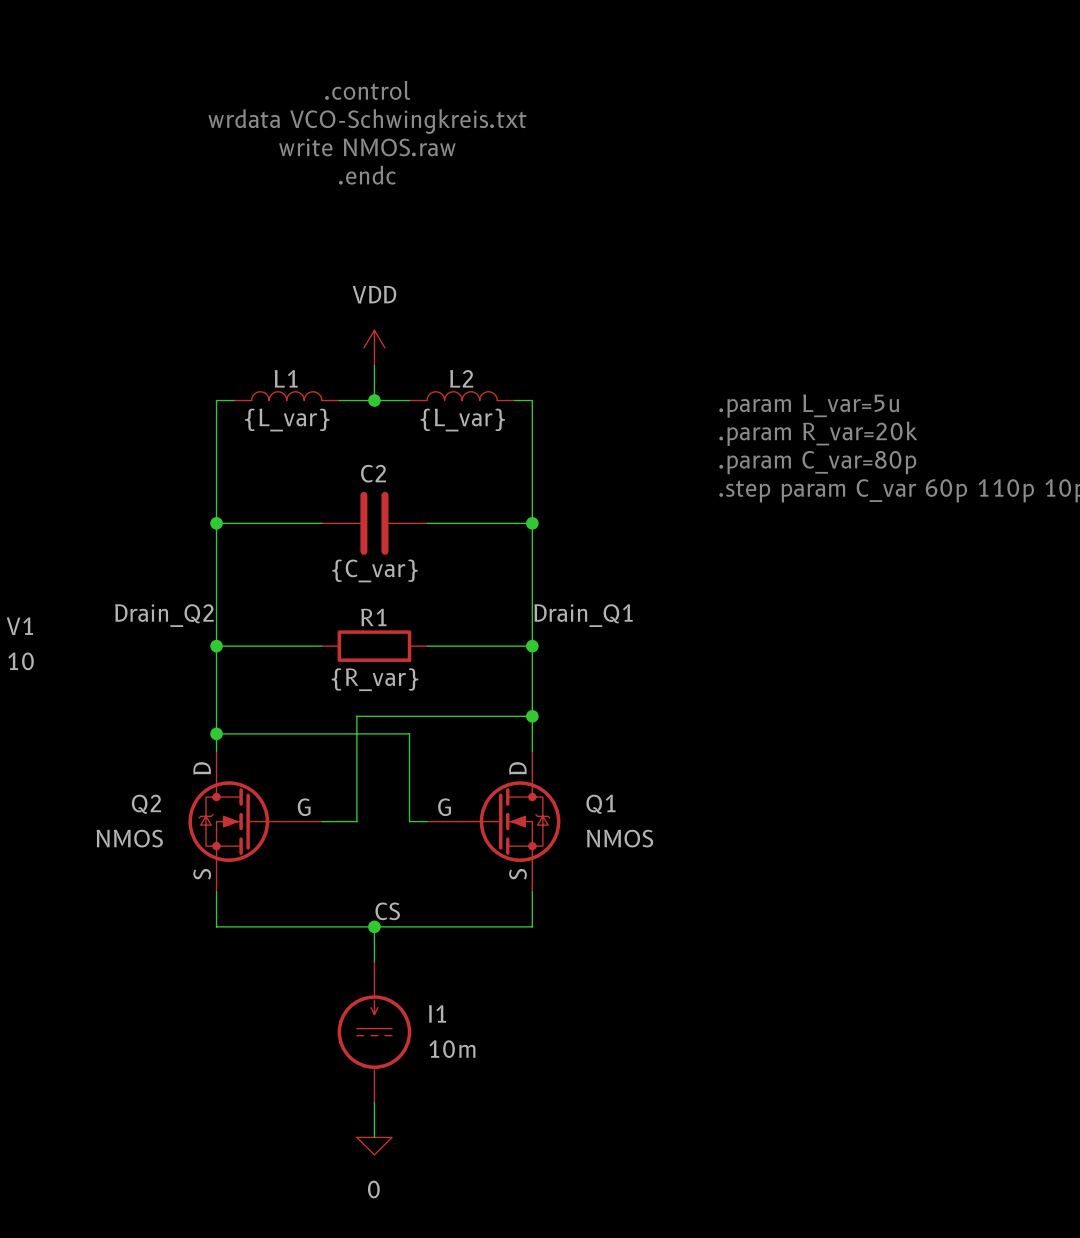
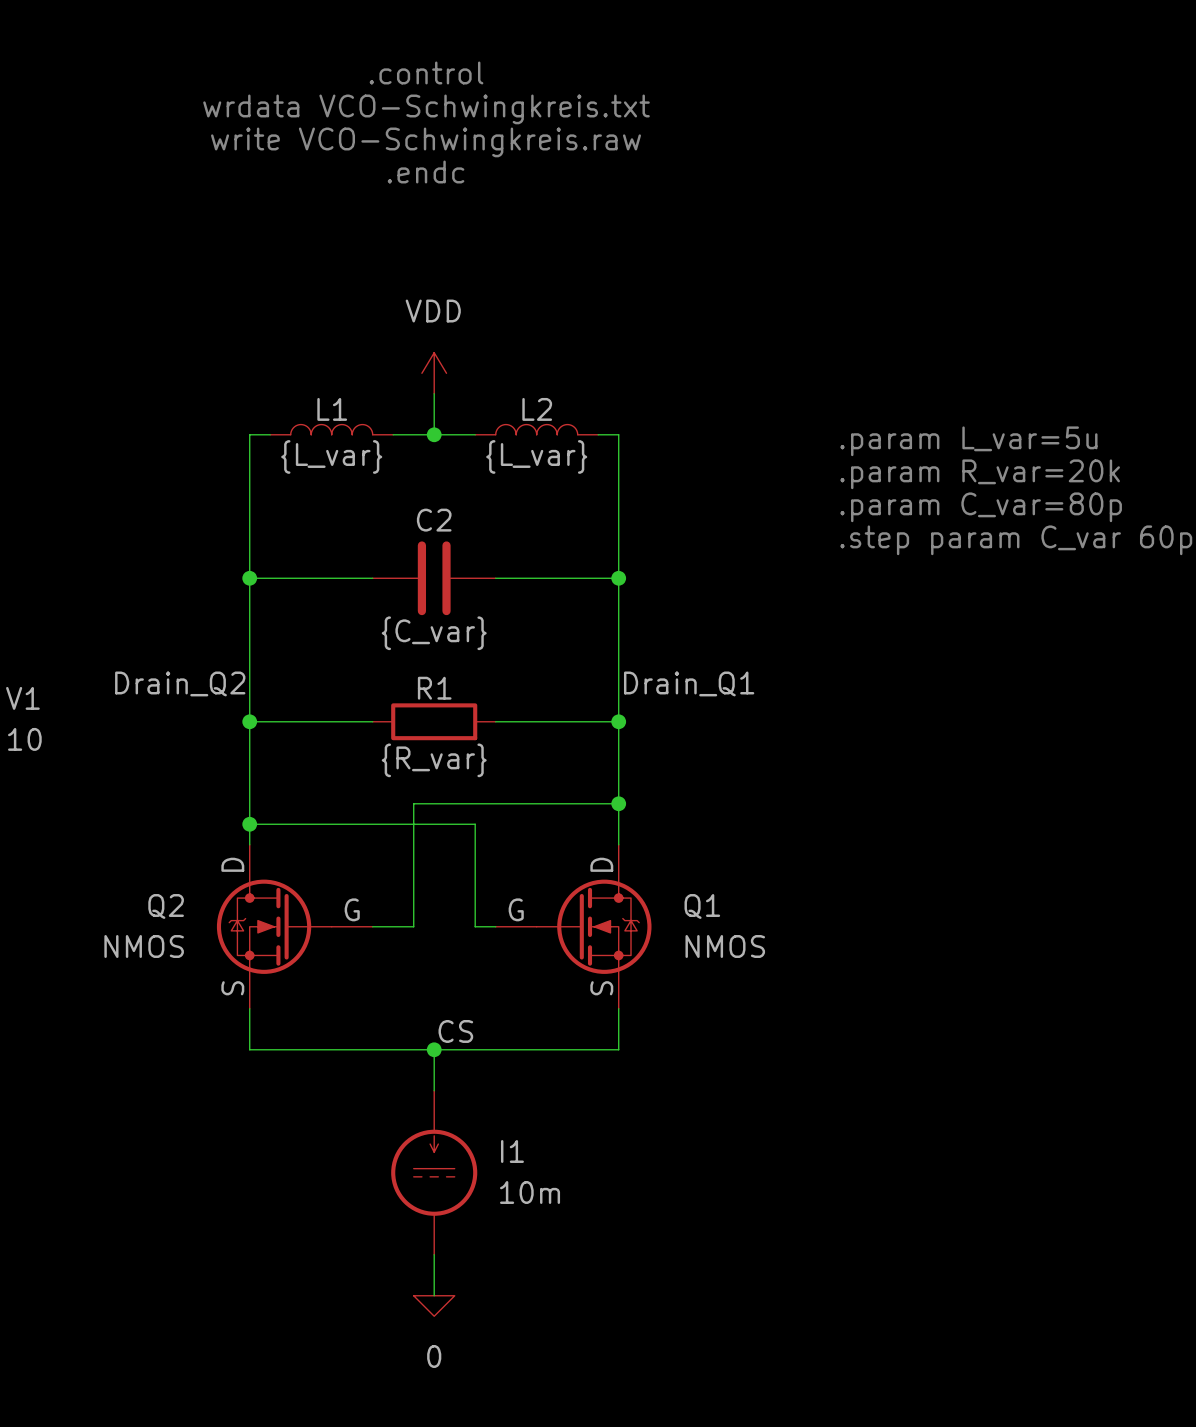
text: write NMOS.raw (367, 147) -> write VCO-Schwingkreis.raw (426, 142)

